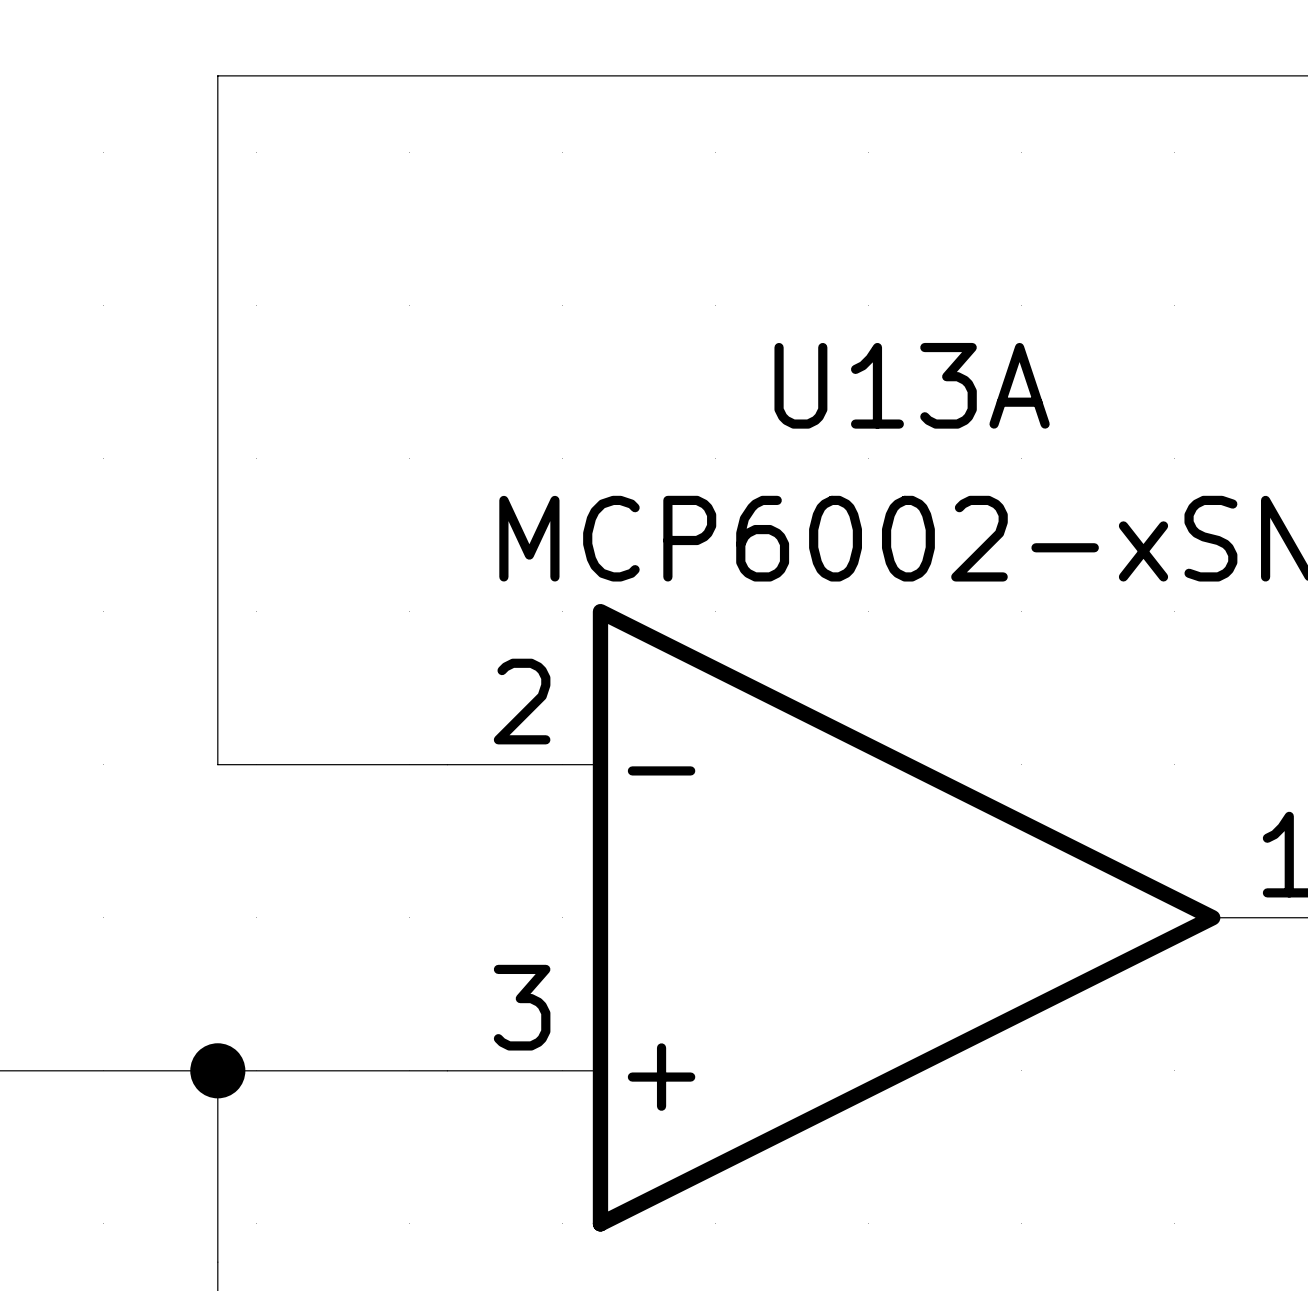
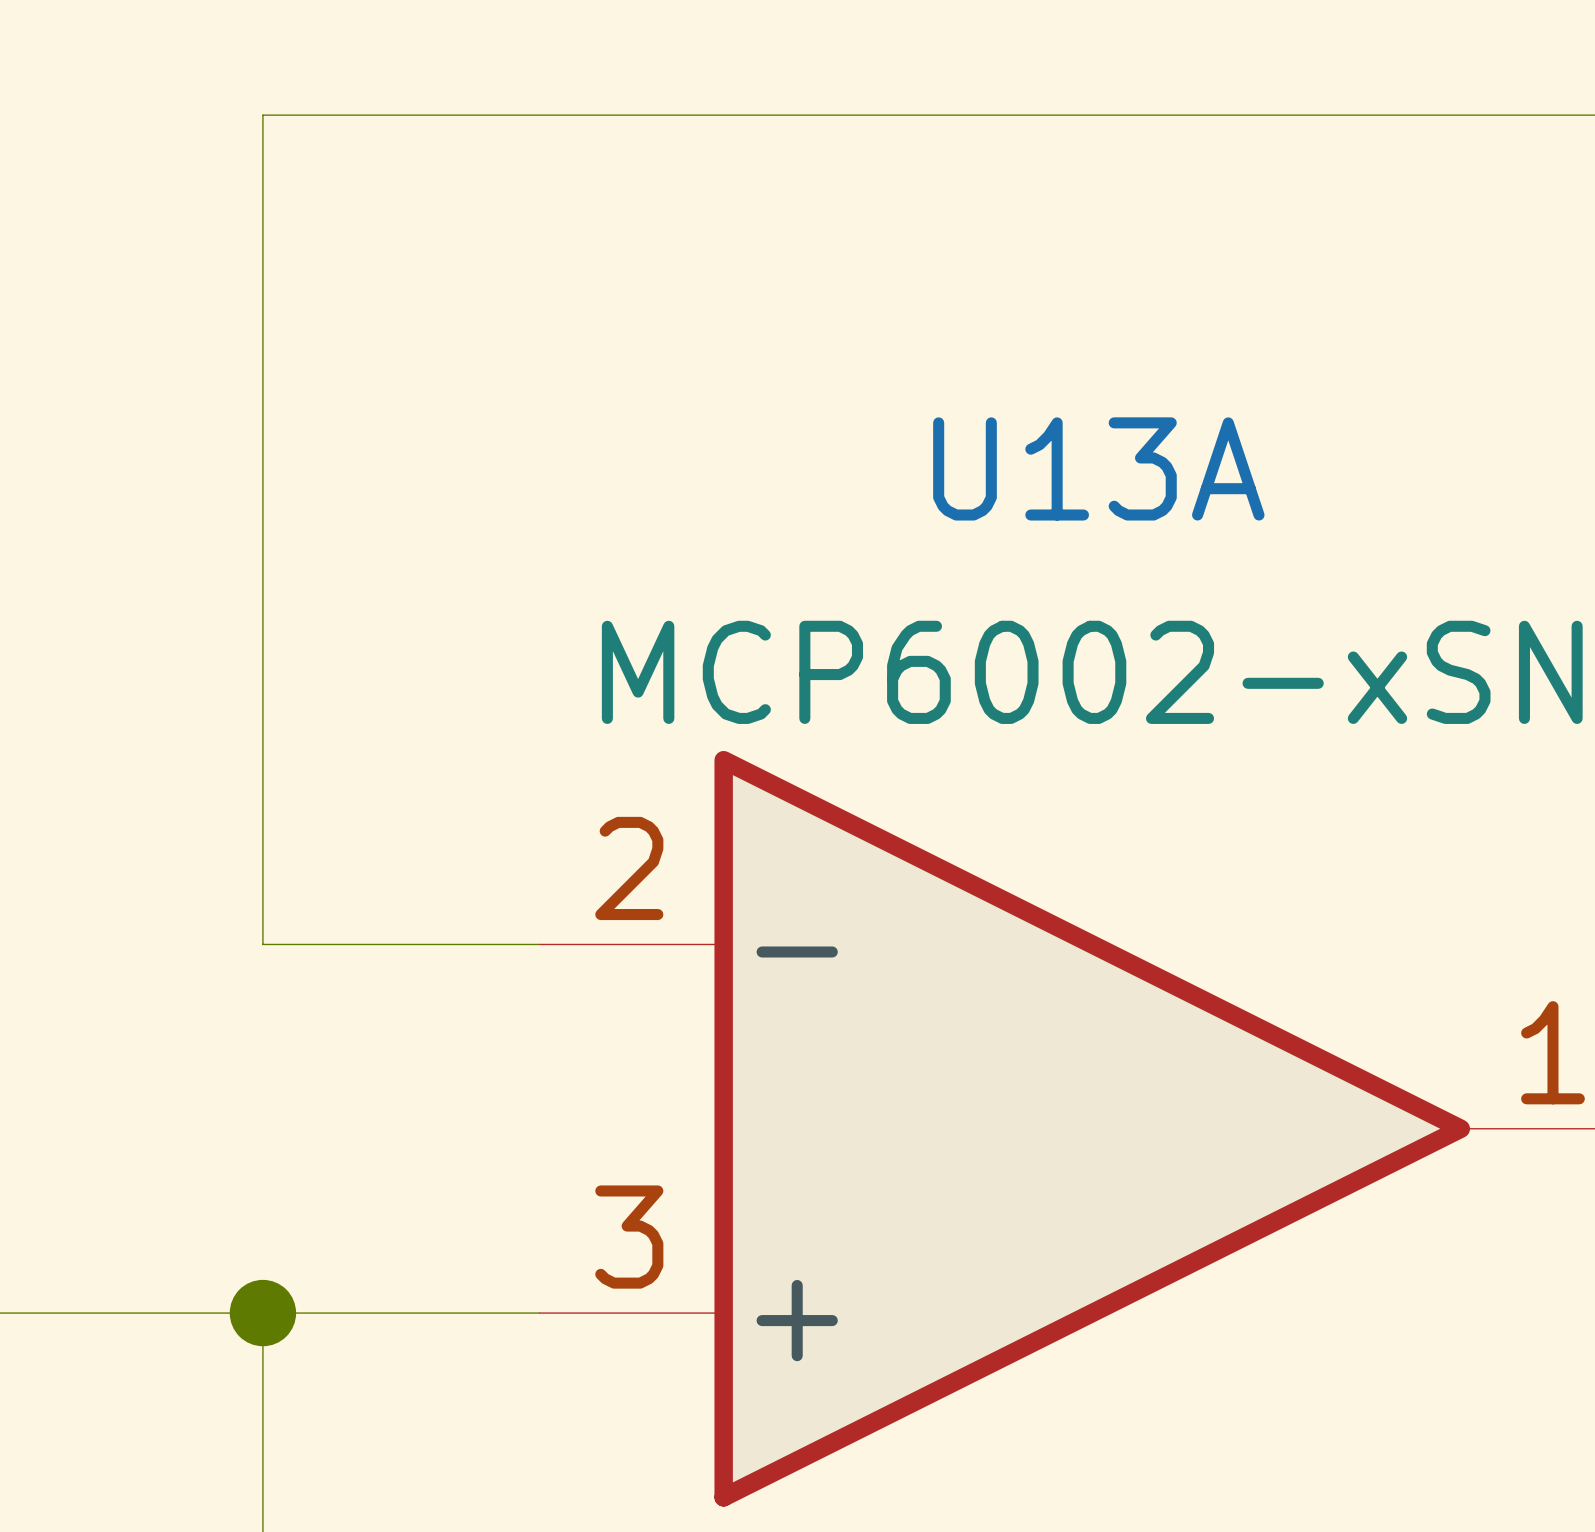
U13A name position: U13A (912, 385) -> U13A (1098, 468)

